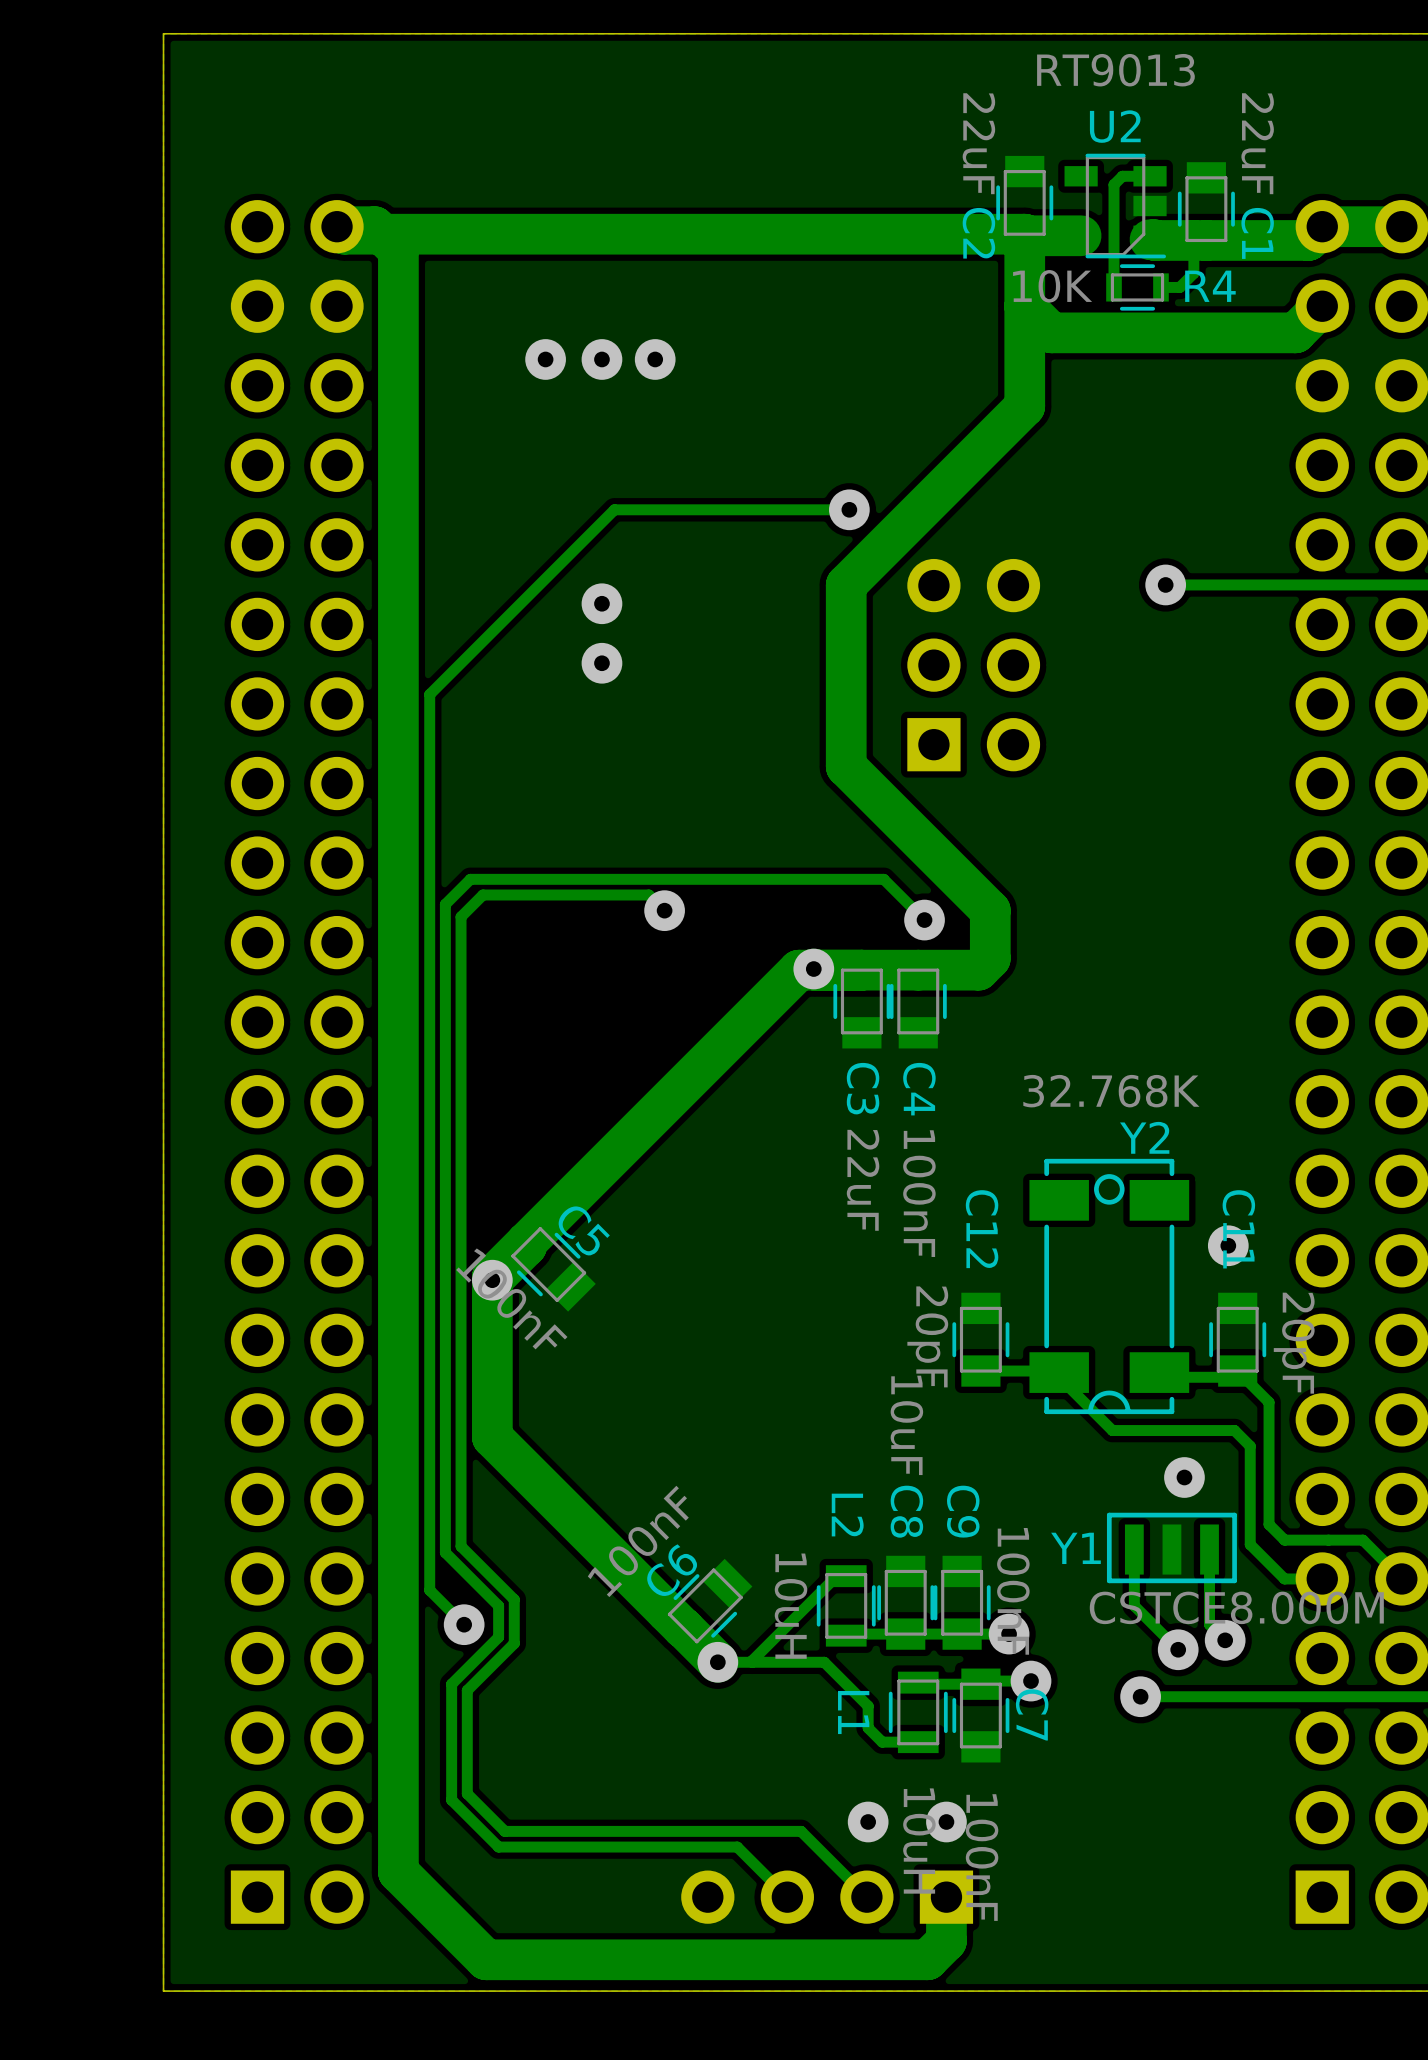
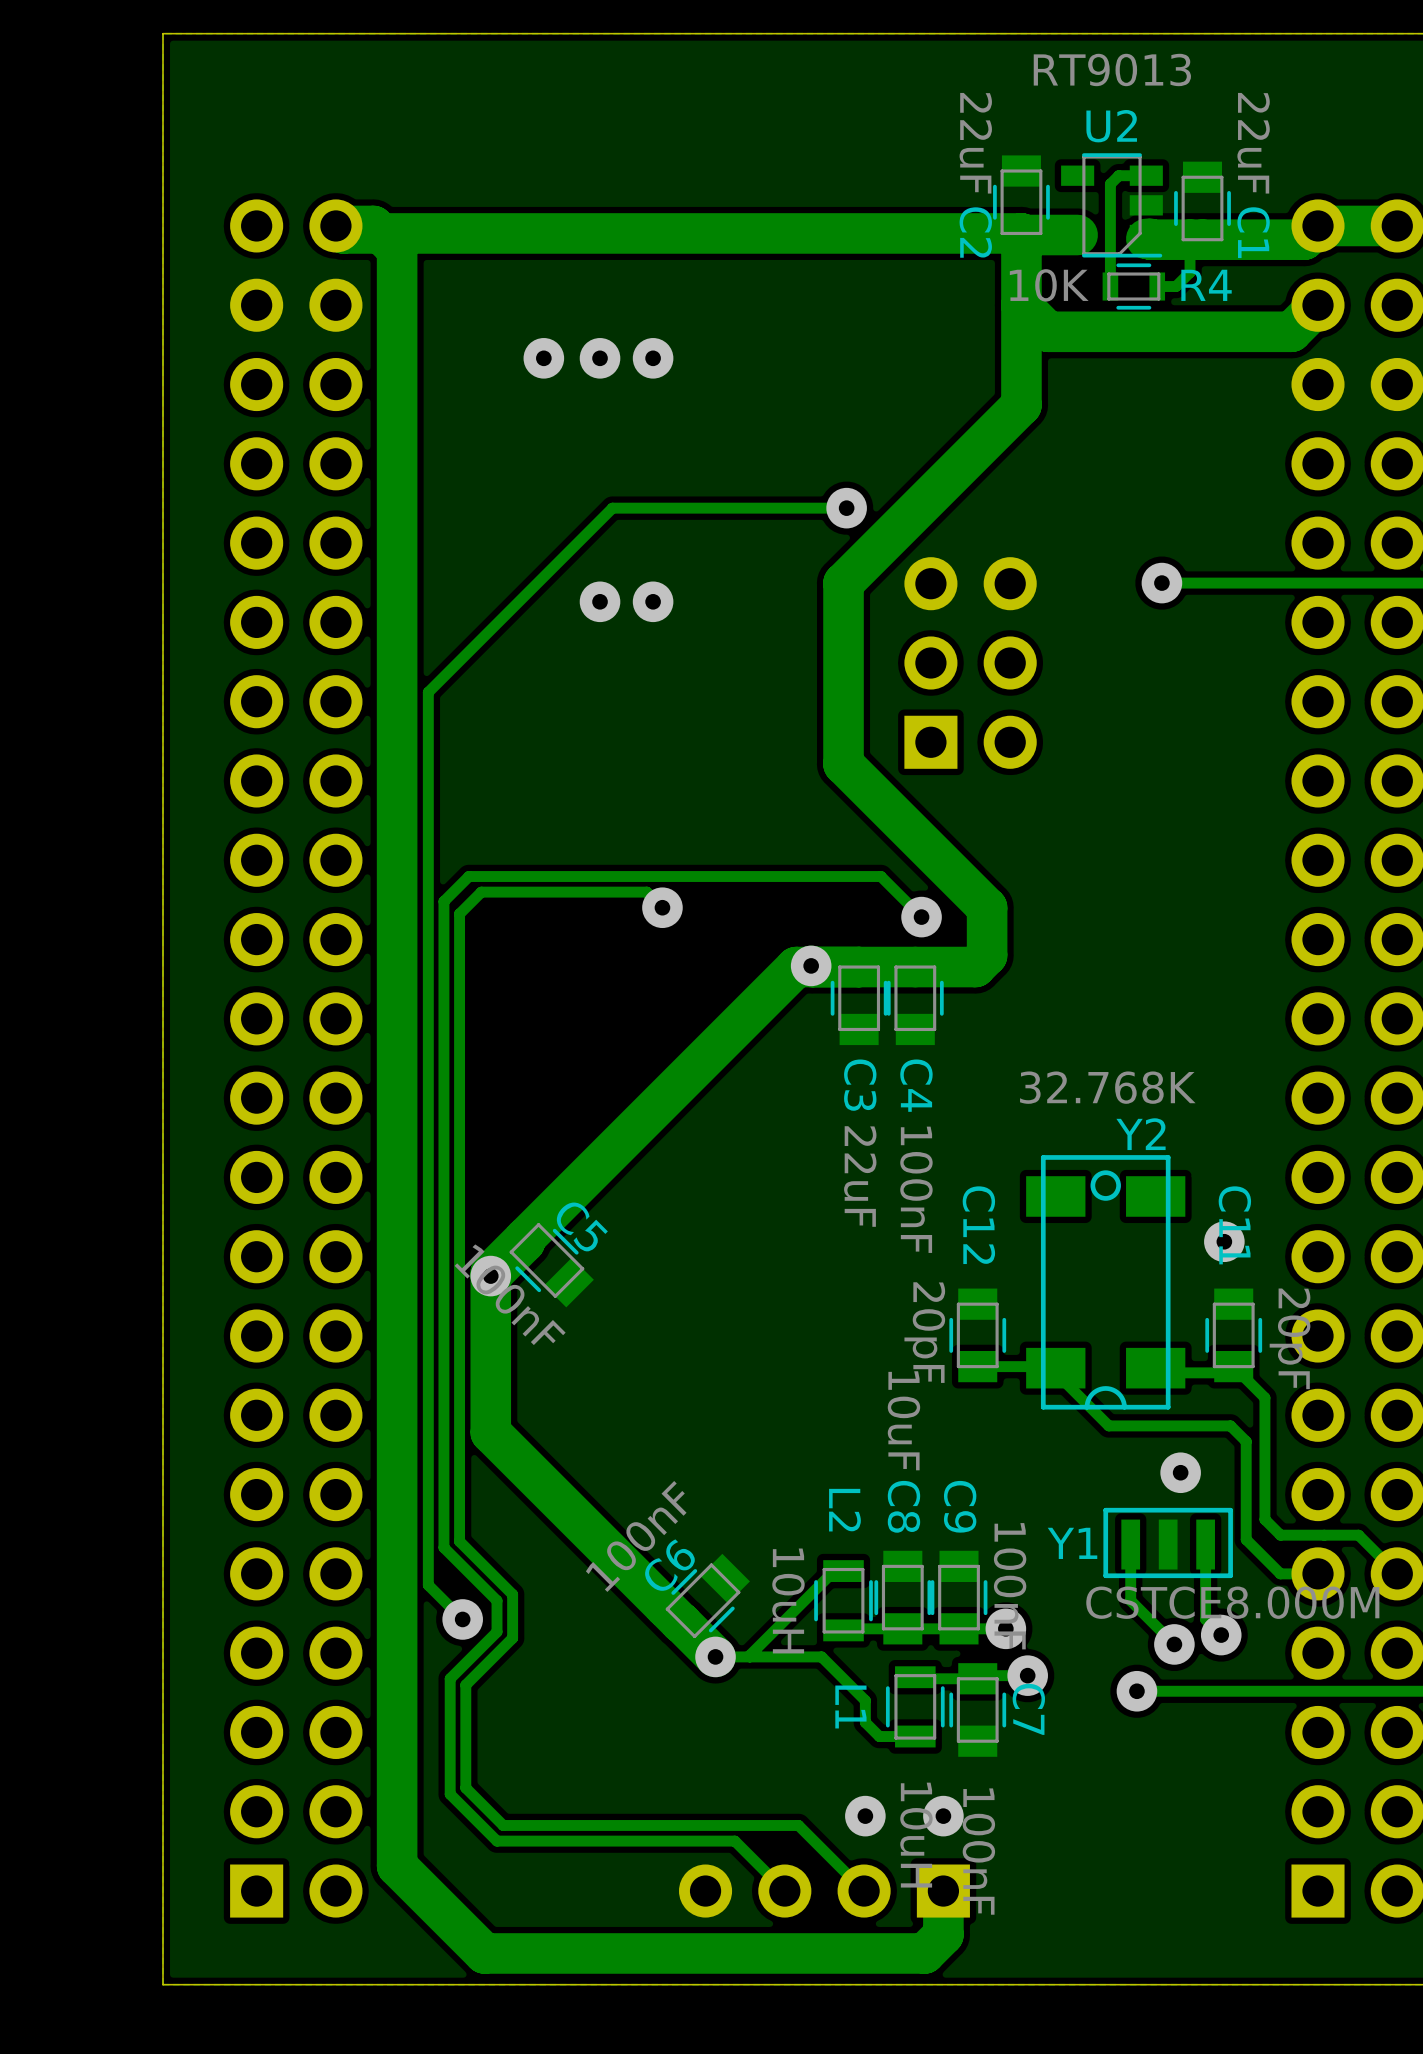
via position: (601, 663) -> (653, 601)
Y2 footprint: [1029, 1158, 1190, 1415] -> [1026, 1155, 1186, 1410]

